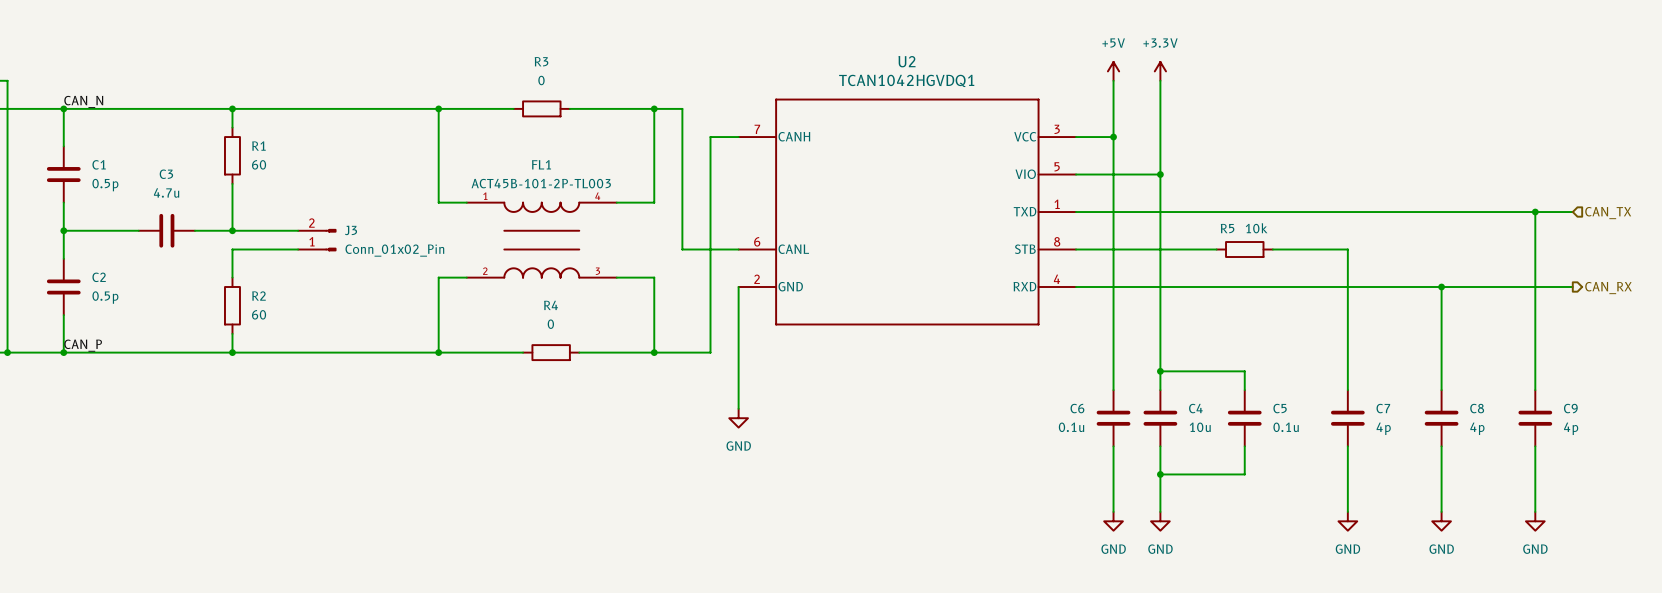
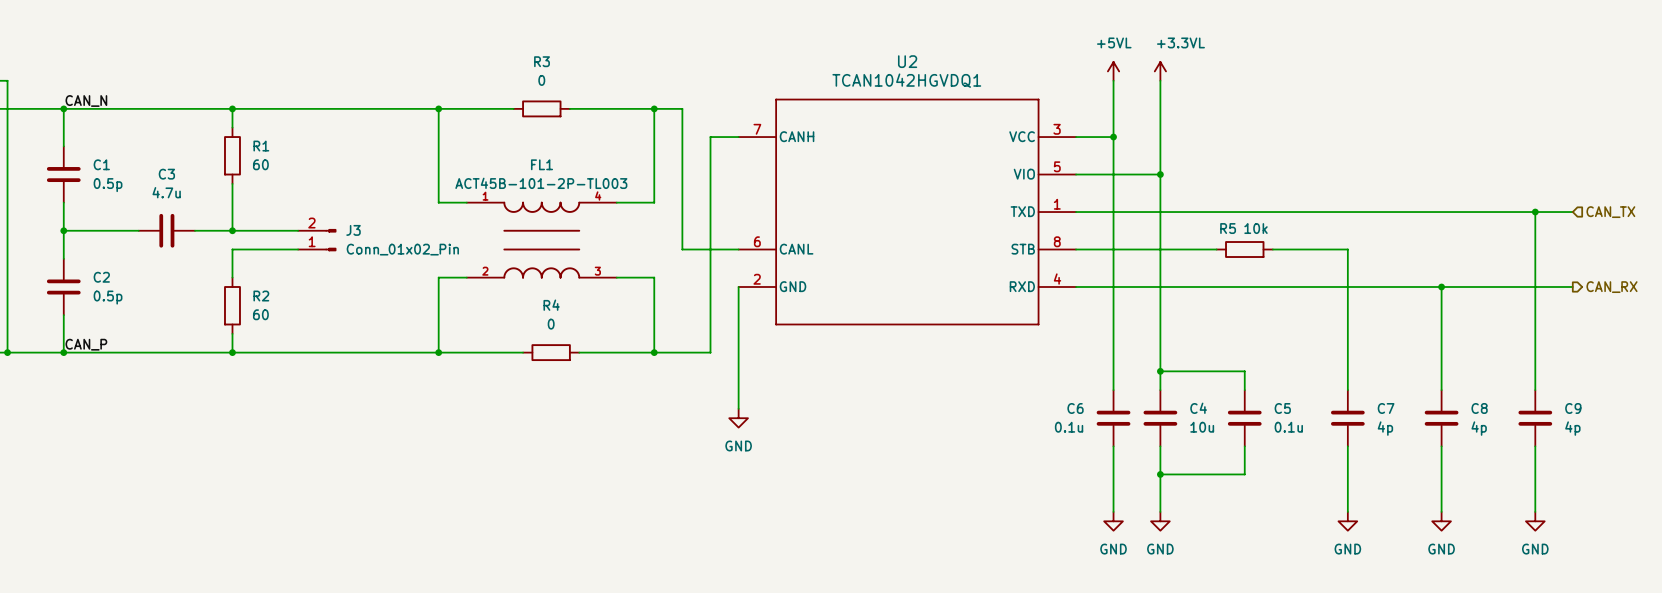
power symbol: +5V (1113, 71) -> +5VL (1113, 71)
power symbol: +3.3V (1160, 71) -> +3.3VL (1160, 71)

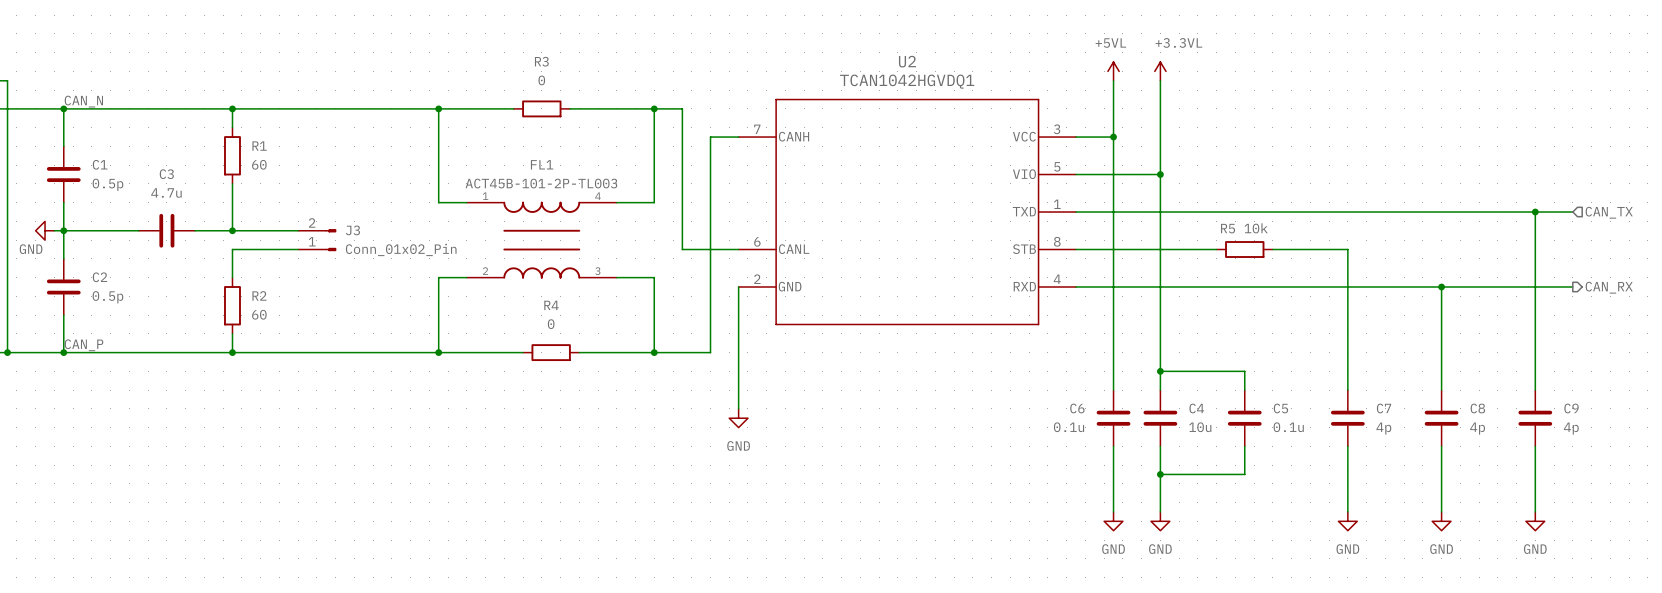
power symbol: none -> GND (45, 230)
wire: none -> (54, 230) (63, 230)

